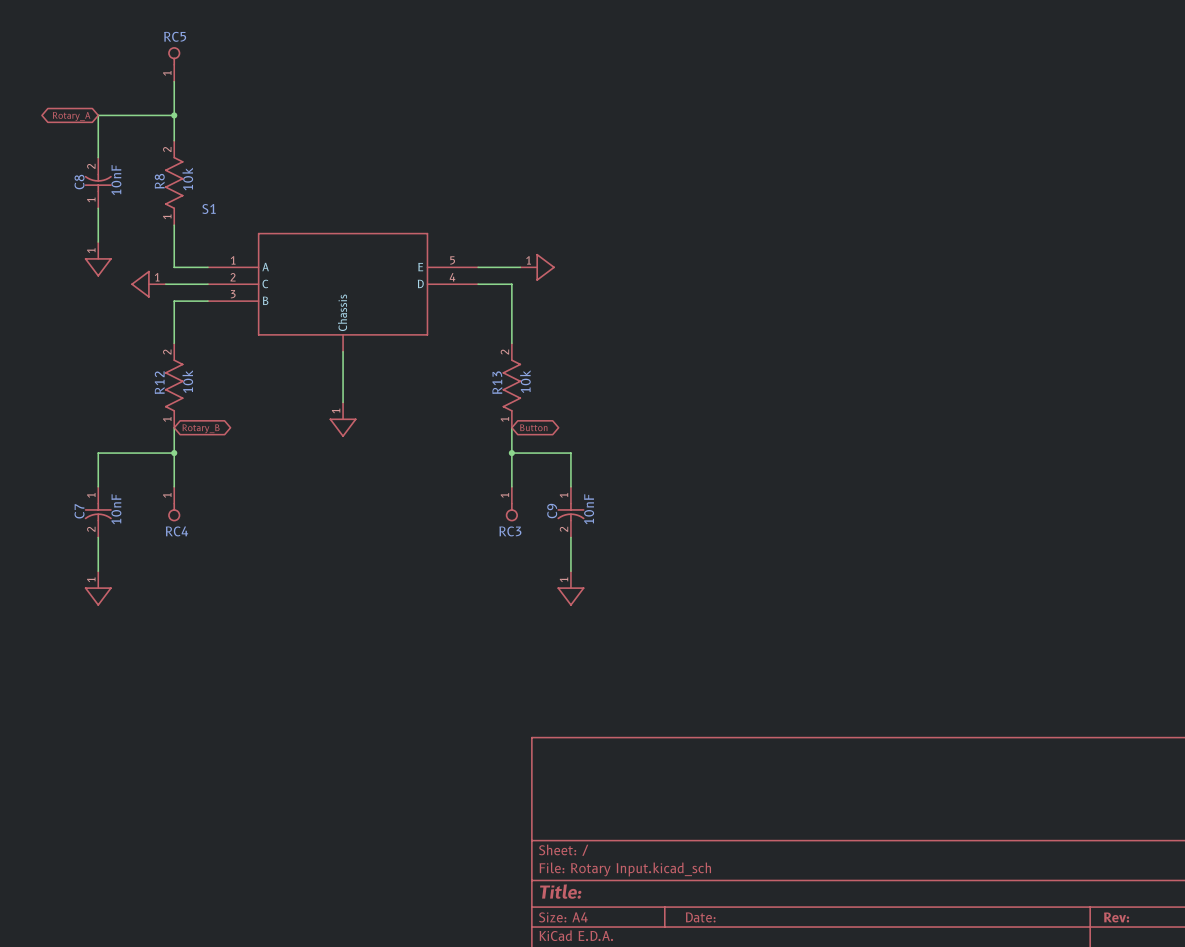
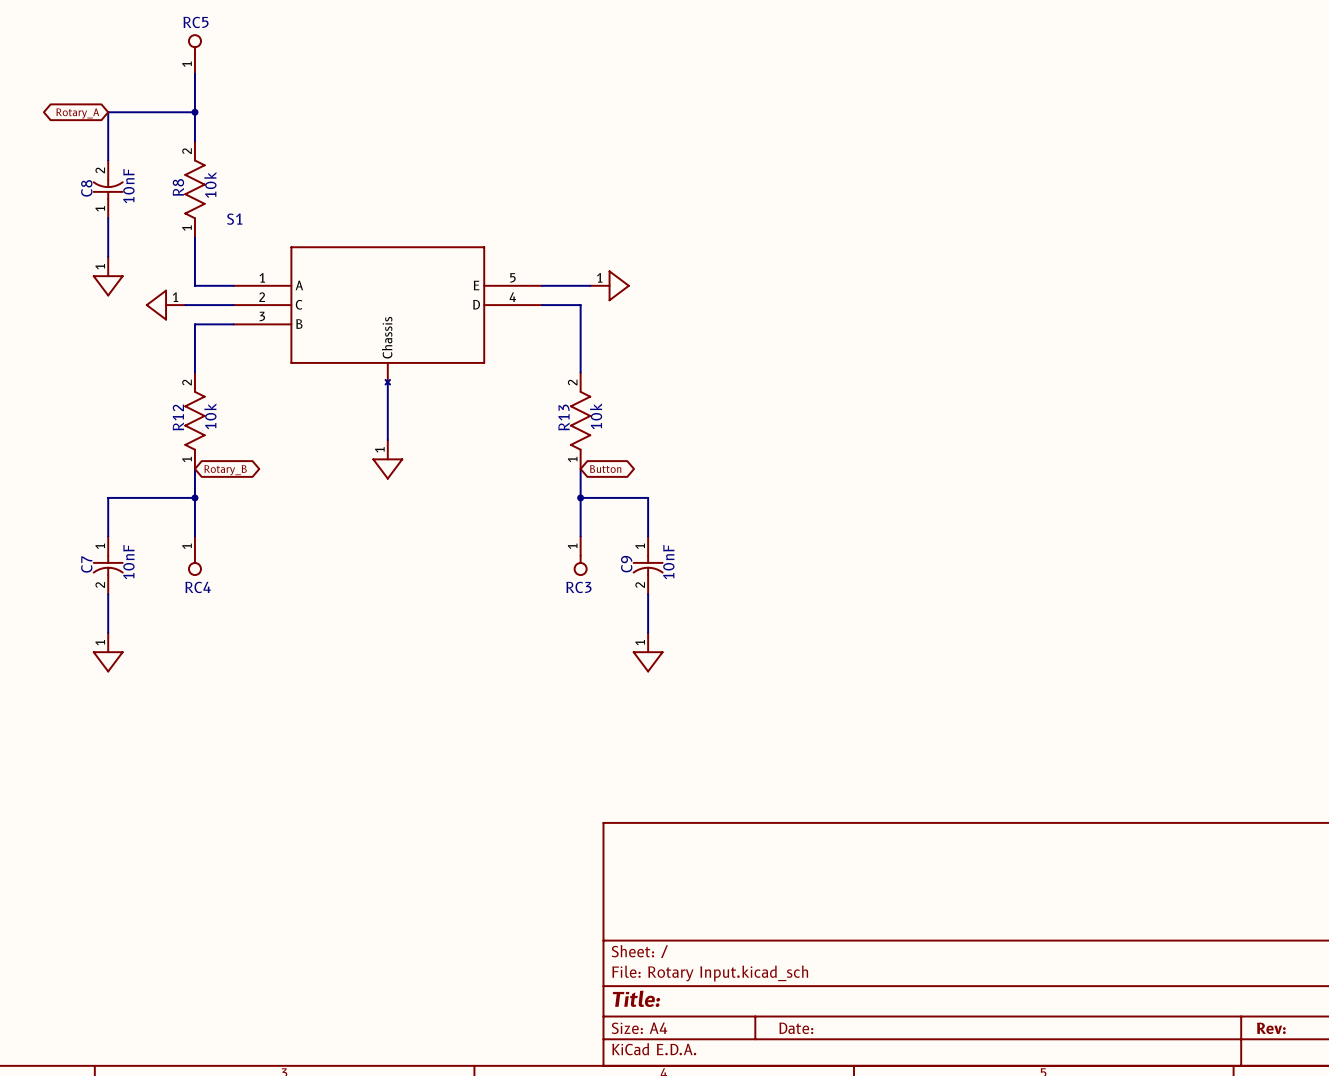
part symbol: [208, 233, 479, 352] -> [233, 246, 543, 385]

